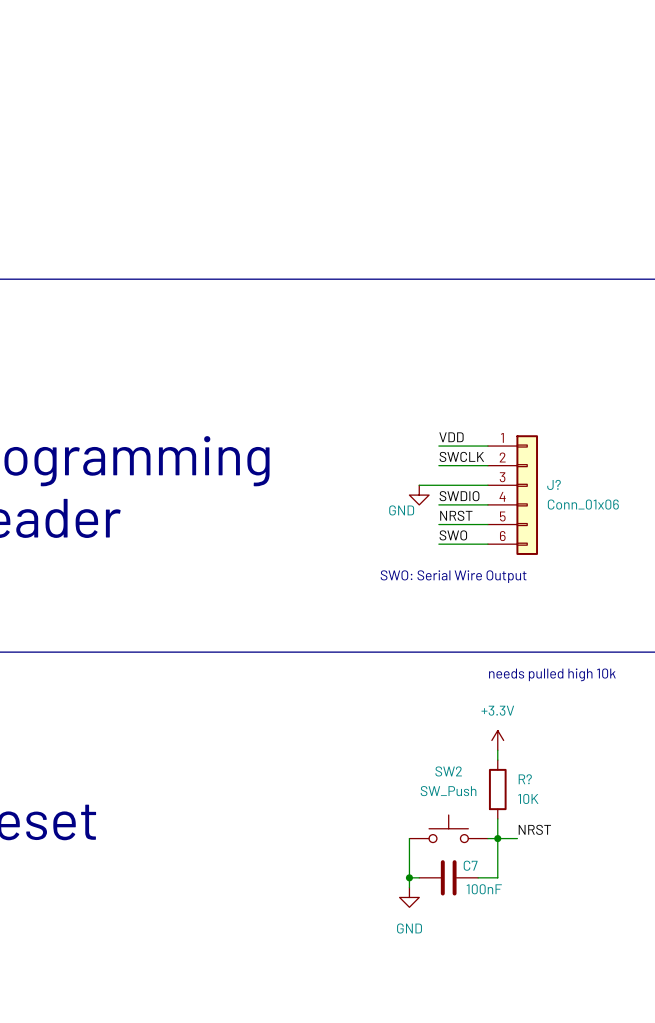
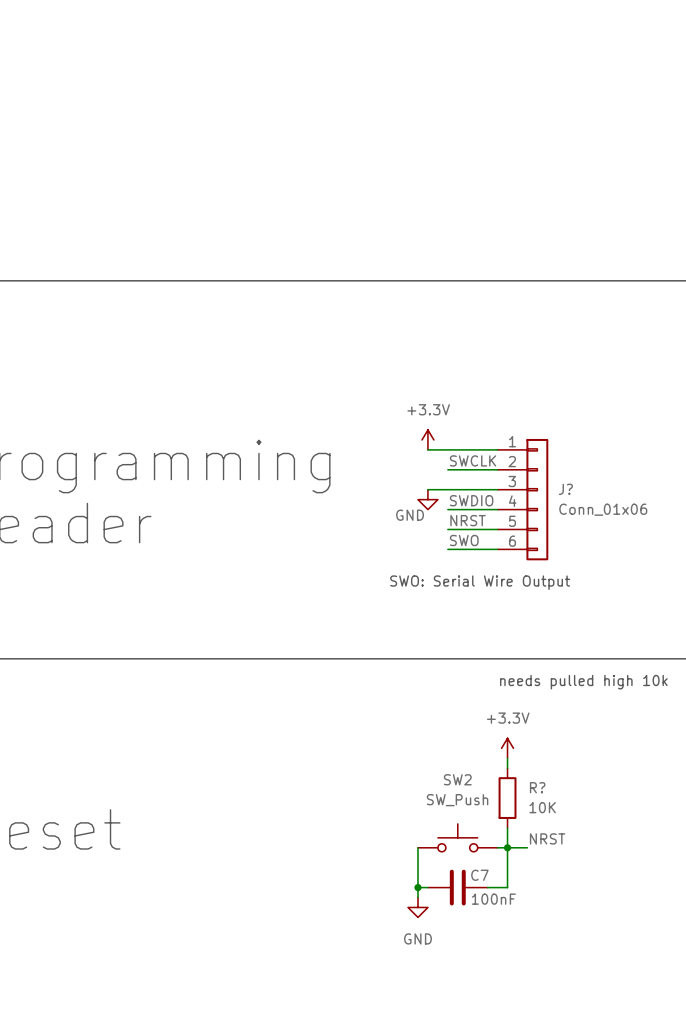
power symbol: none -> +3.3V (427, 439)
label: VDD (451, 437) -> none
wire: none -> (427, 449) (447, 449)

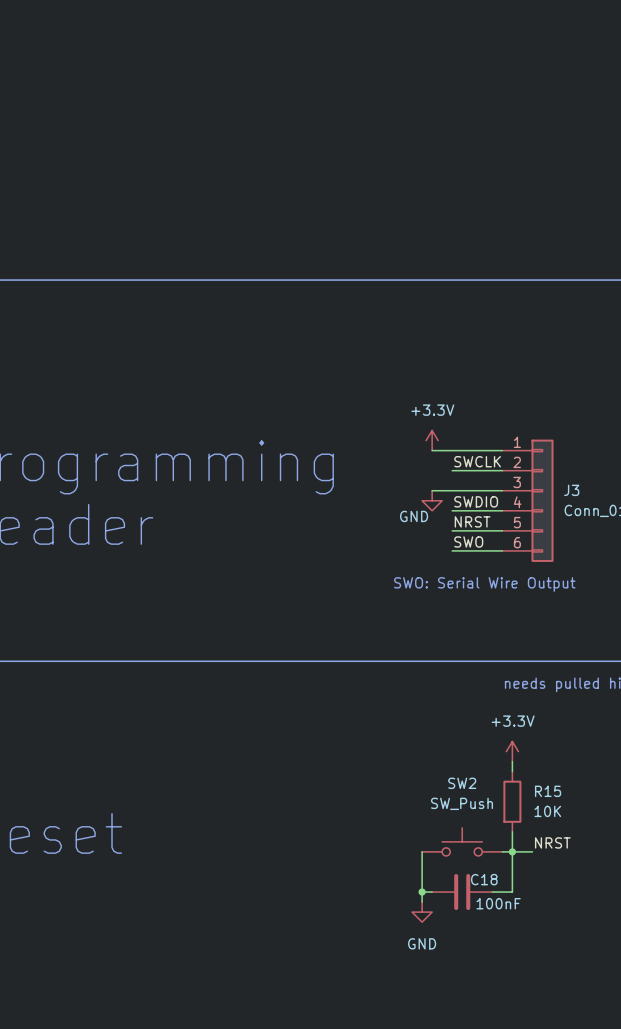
J? name: J? (565, 489) -> J3 (571, 490)
R? name: R? (537, 787) -> R15 (548, 791)
C7 name: C7 (479, 875) -> C18 (484, 879)

